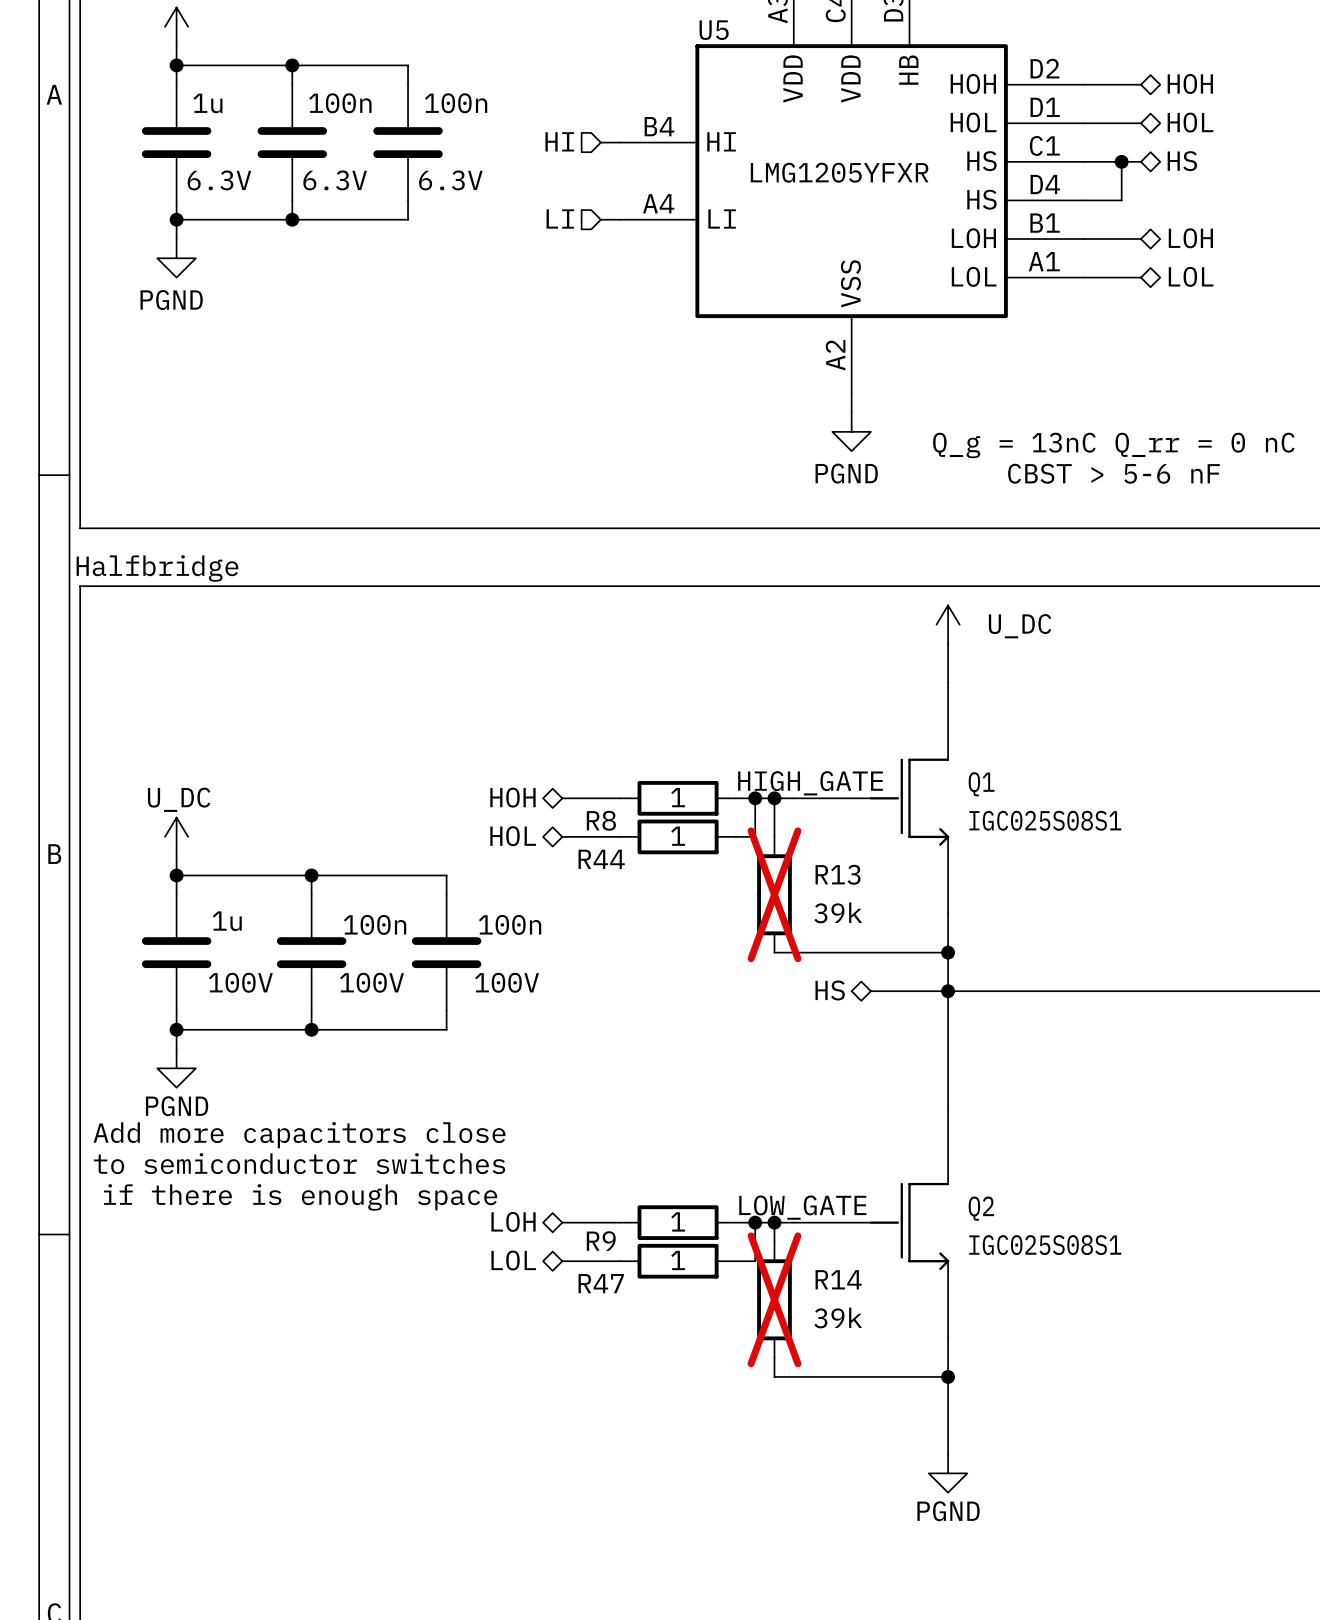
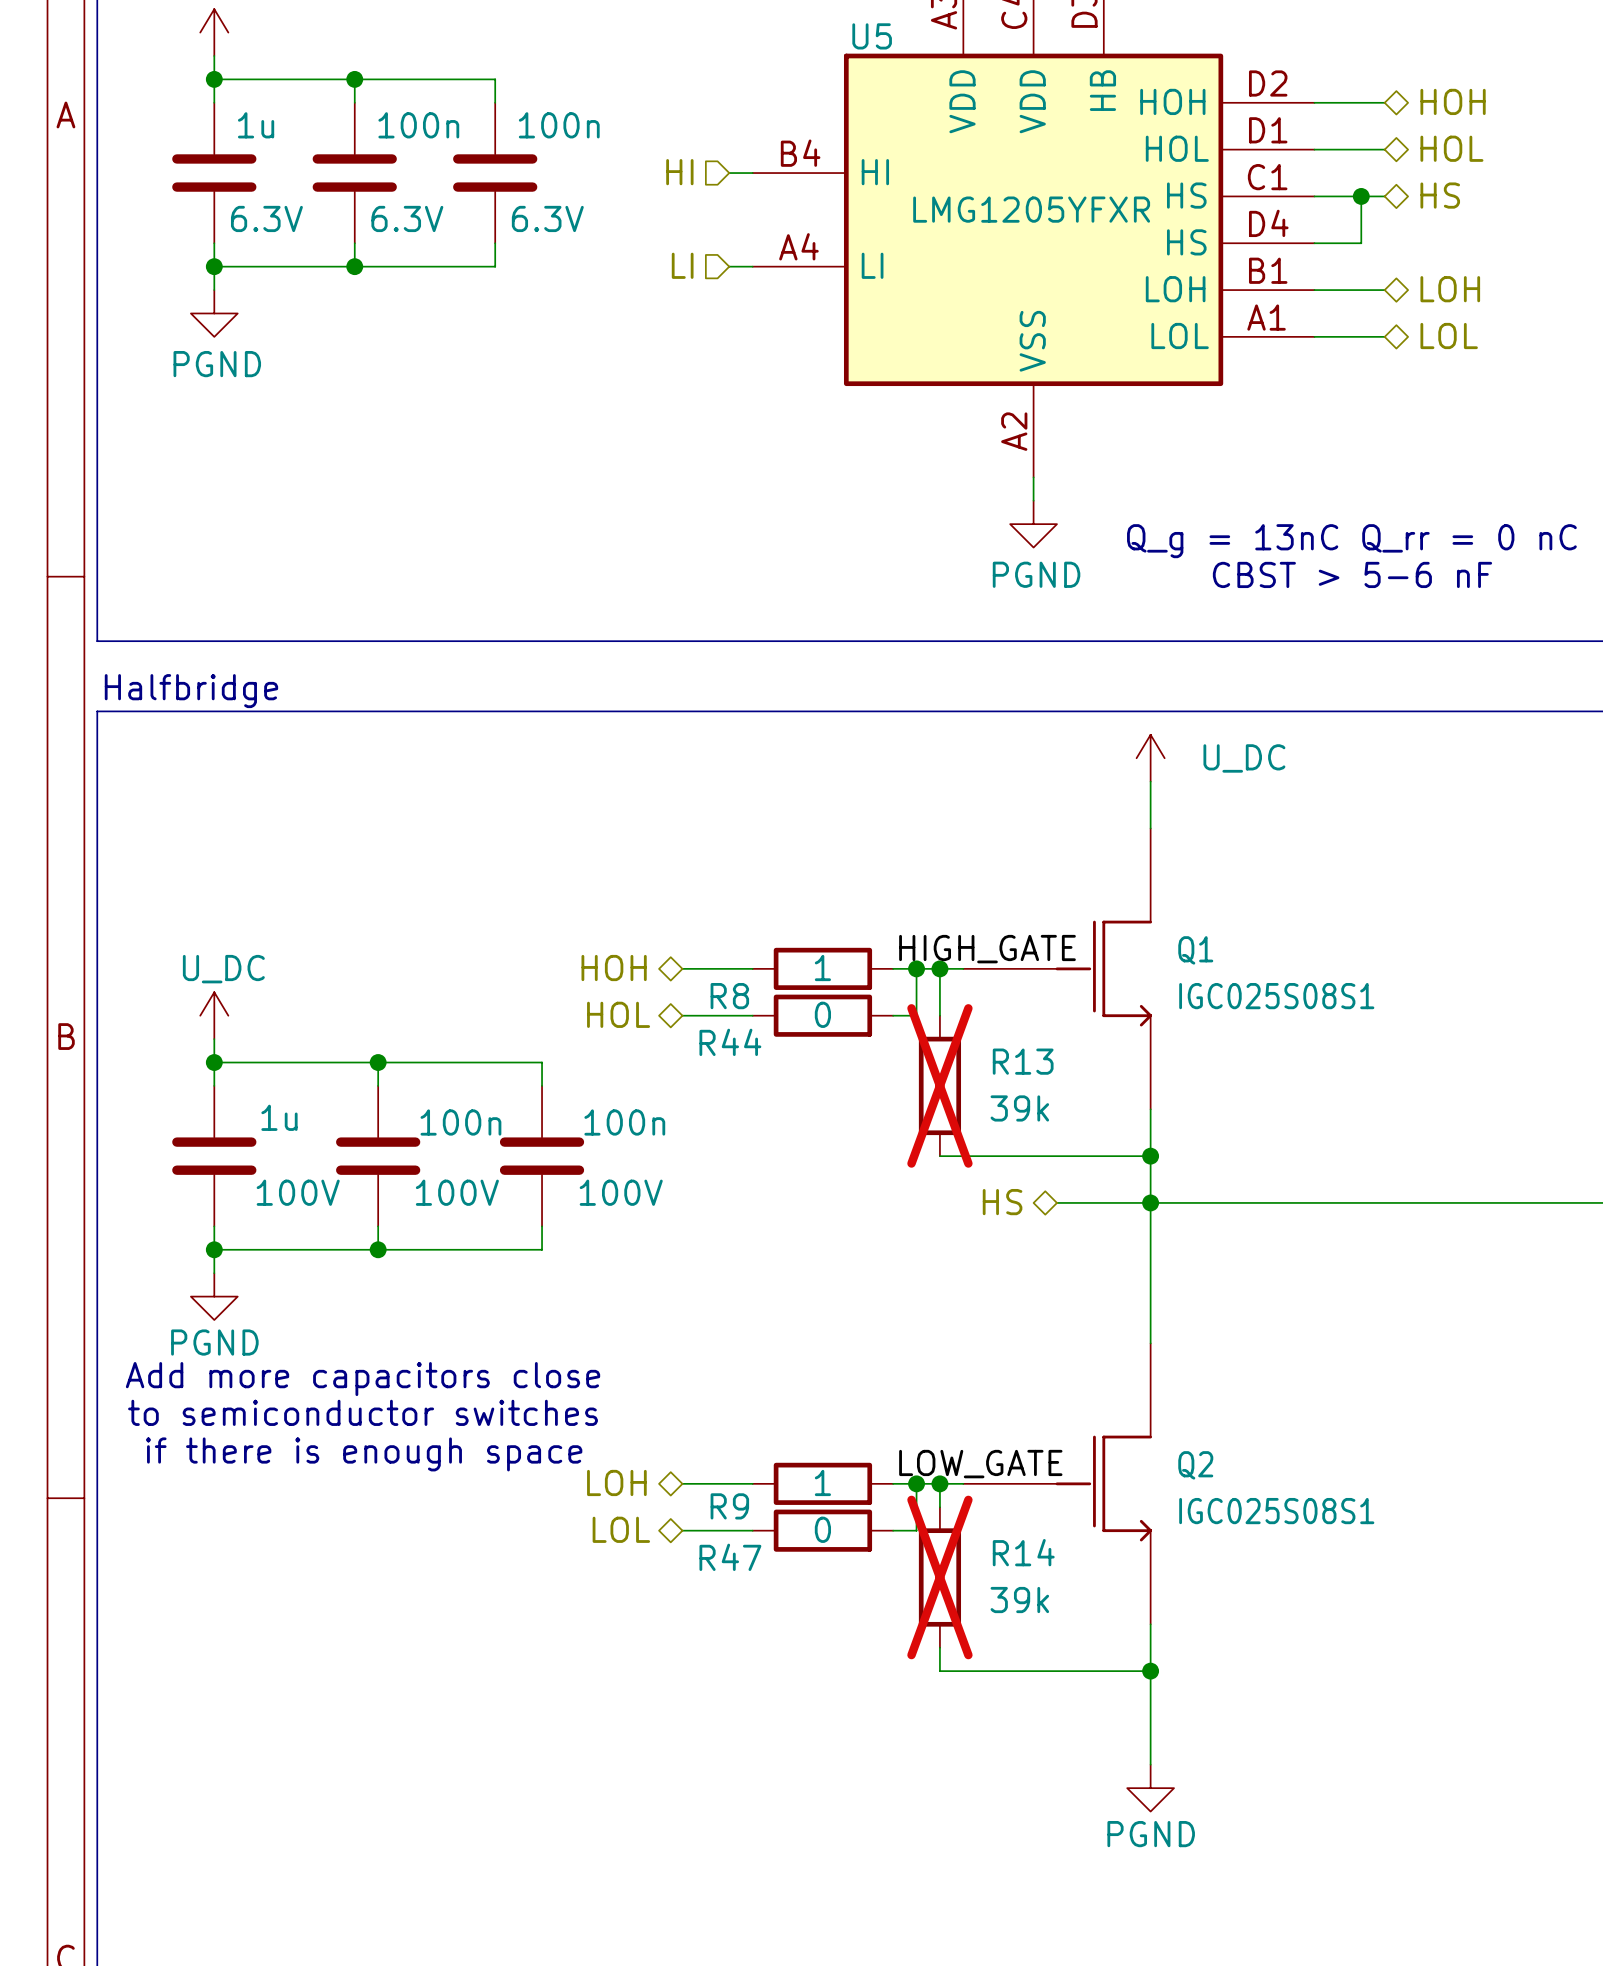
R44 value: 1 (678, 836) -> 0 (822, 1014)
R47 value: 1 (678, 1260) -> 0 (822, 1529)

